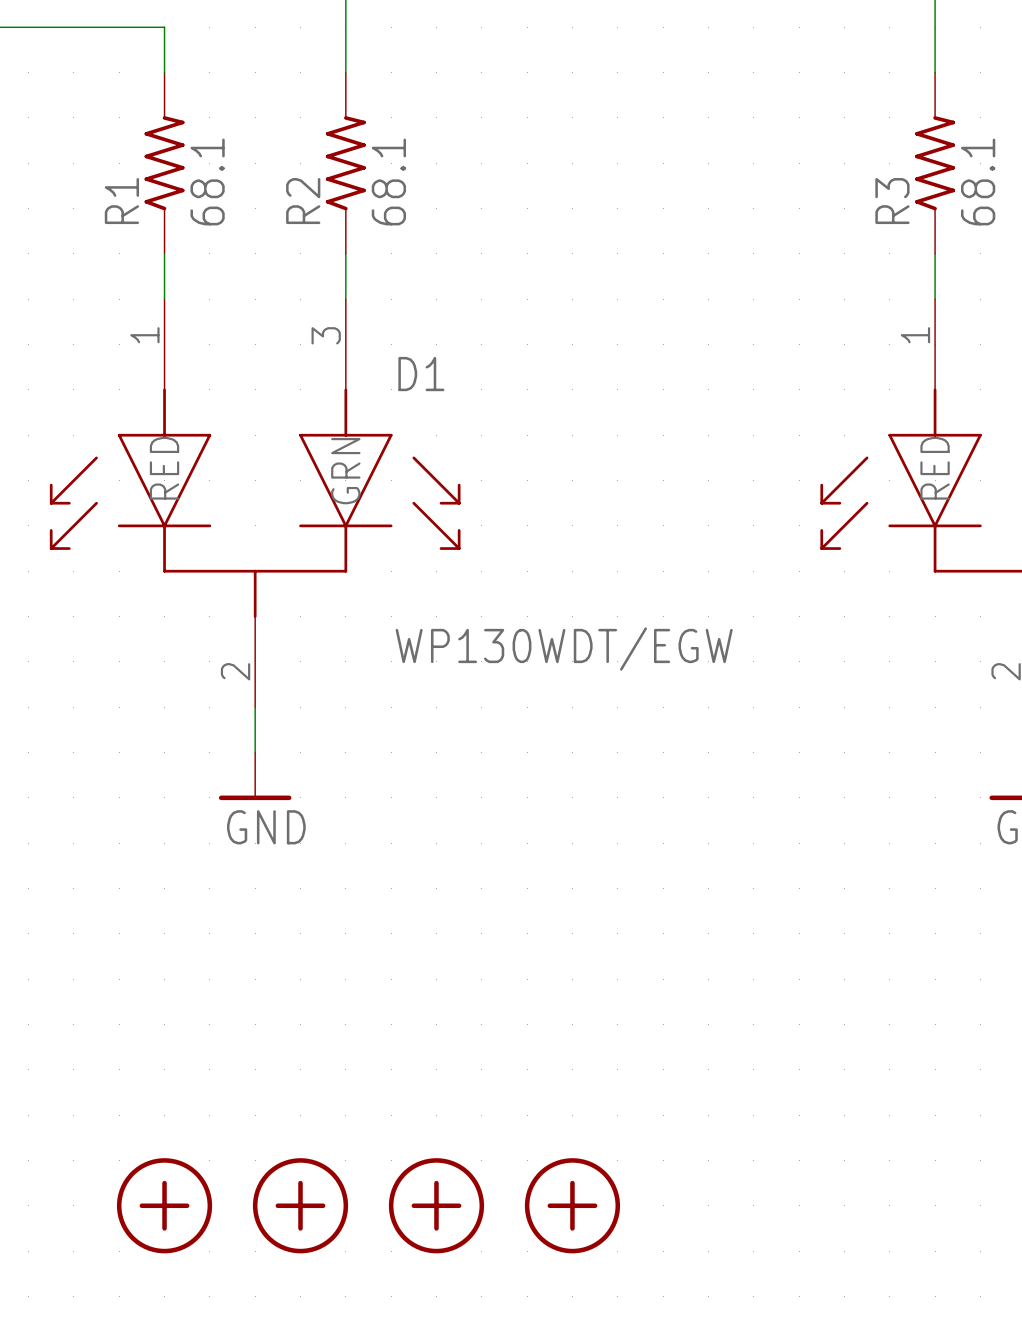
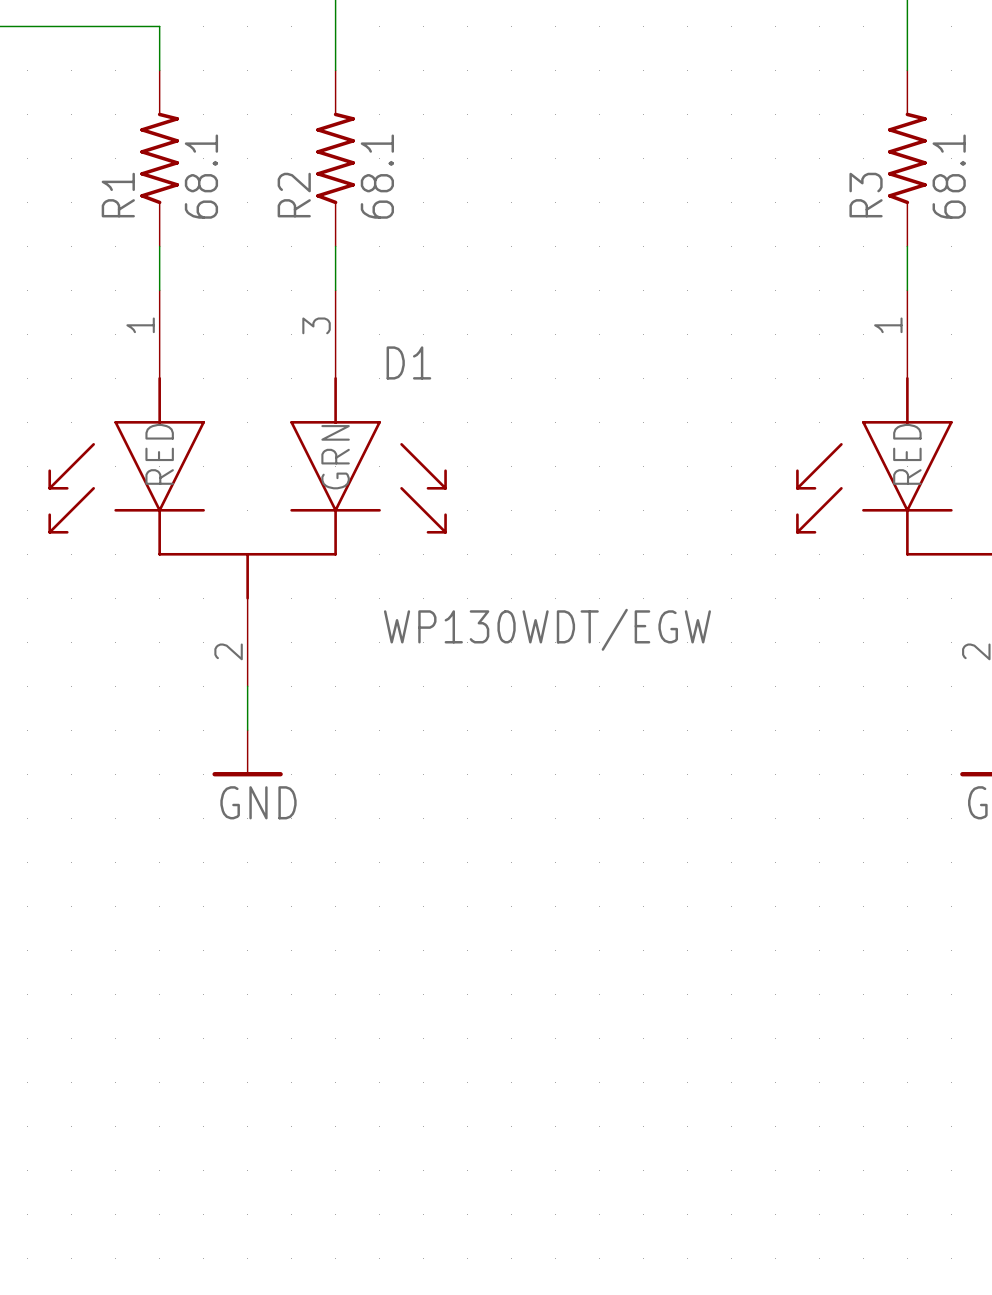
part: (164, 1205) -> none
part: (300, 1205) -> none
part: (436, 1205) -> none
part: (572, 1205) -> none

